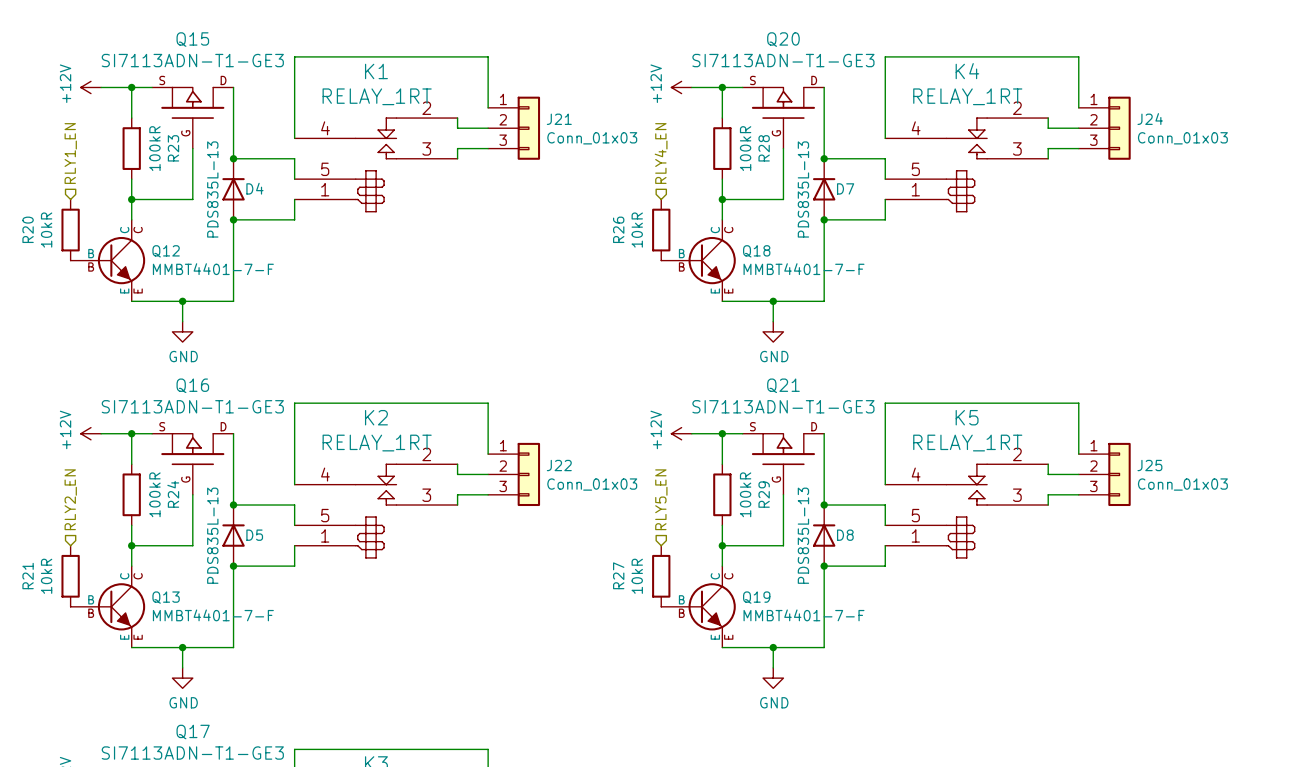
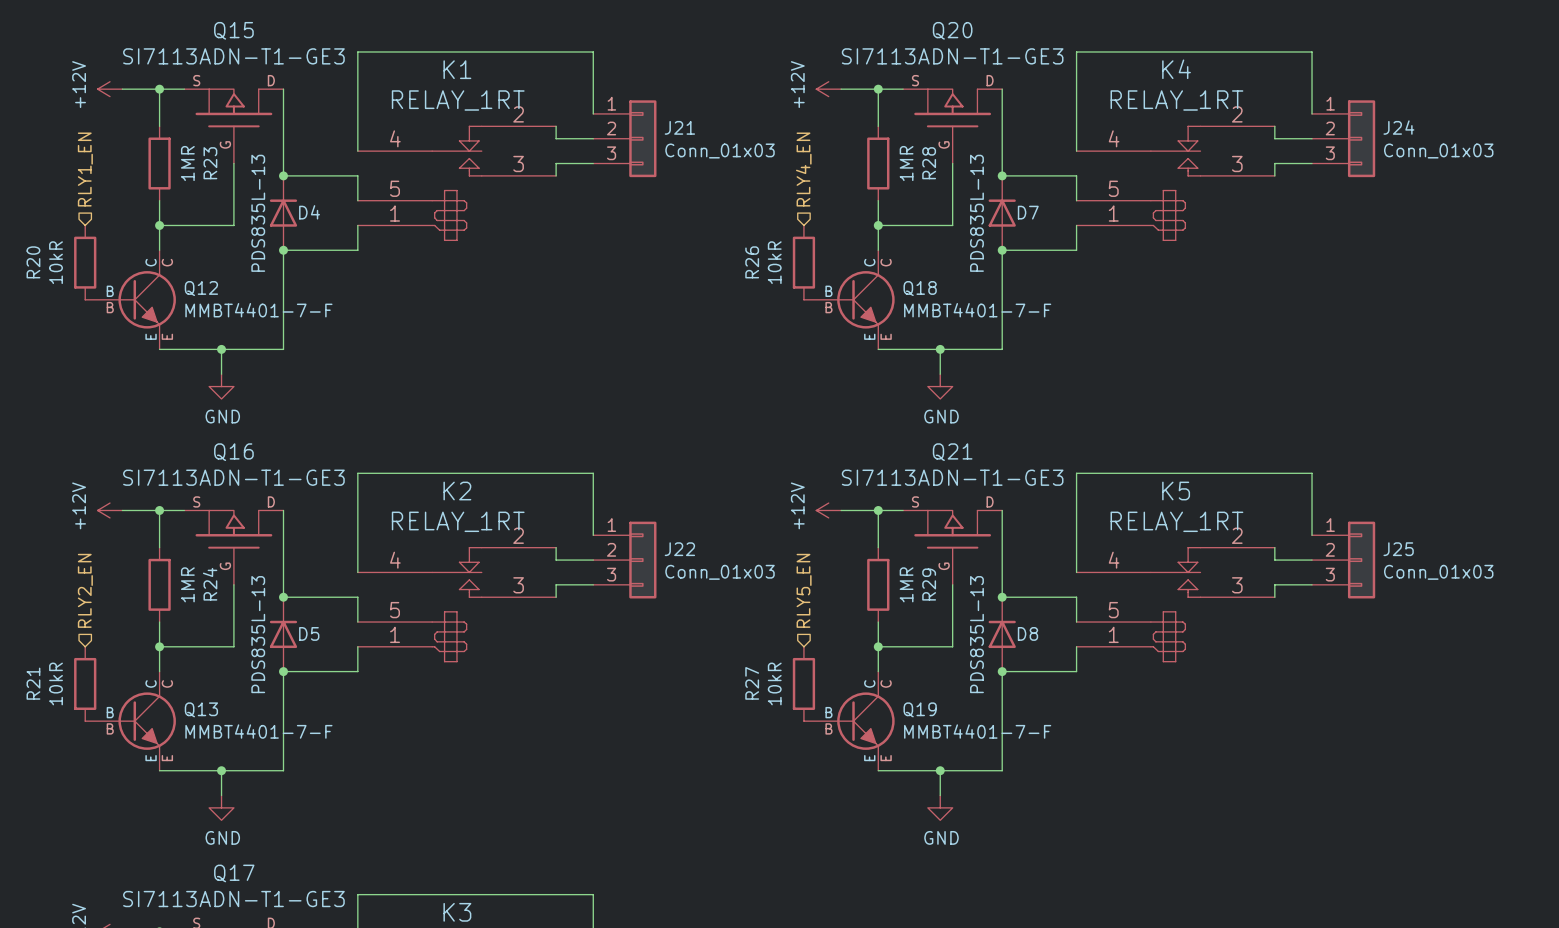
R23 value: 100kR (154, 148) -> 1MR (187, 163)
R28 value: 100kR (745, 148) -> 1MR (906, 163)
R24 value: 100kR (154, 494) -> 1MR (187, 584)
R29 value: 100kR (745, 494) -> 1MR (906, 584)

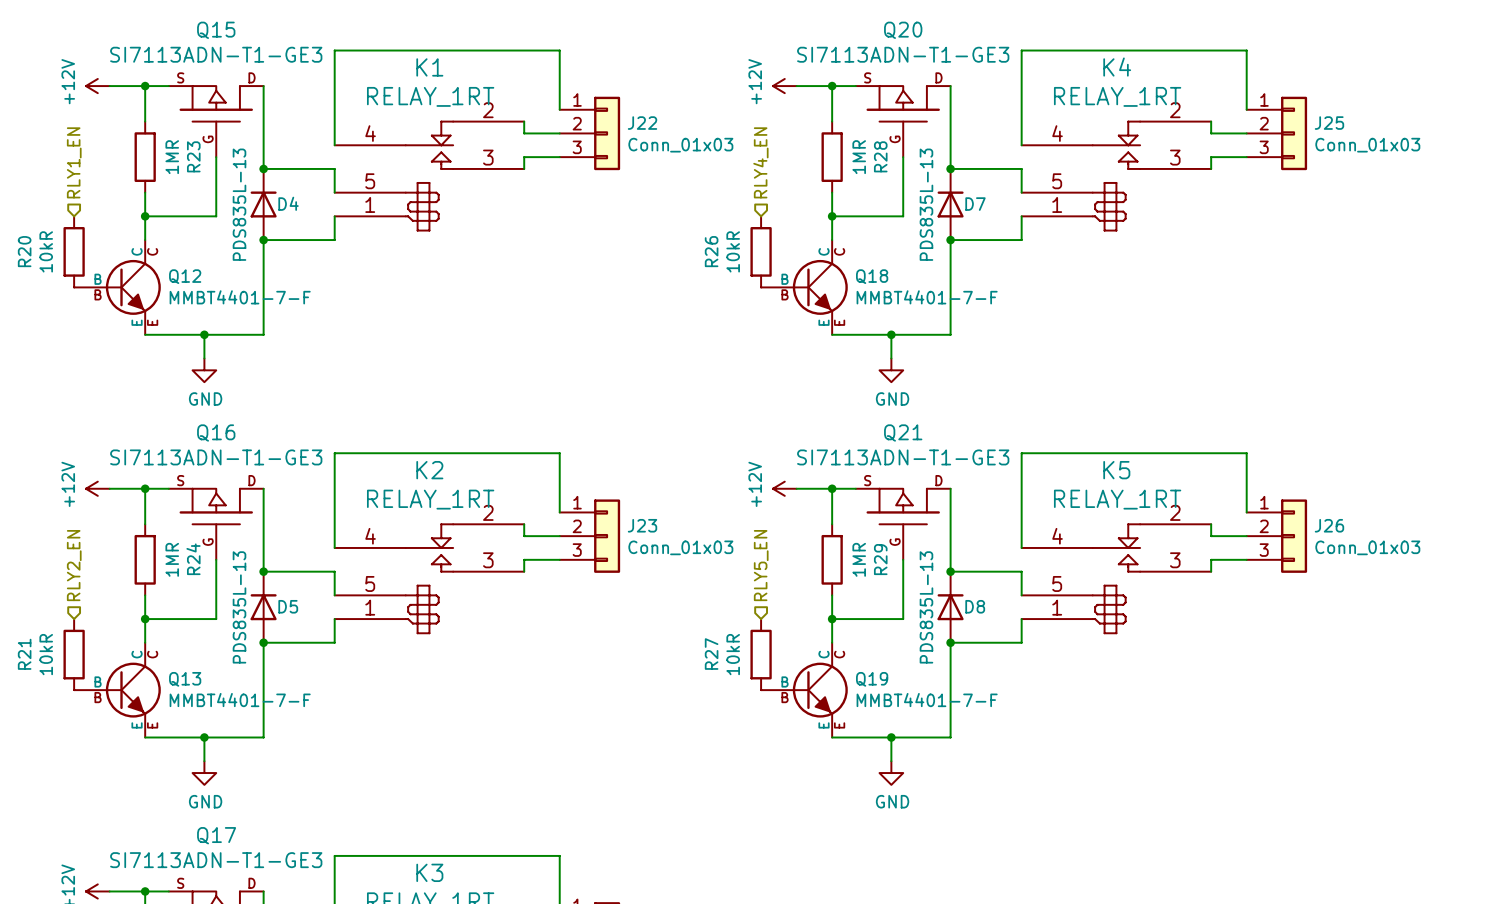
J21 name: J21 (679, 127) -> J22 (642, 123)
J24 name: J24 (1398, 127) -> J25 (1329, 123)
J22 name: J22 (679, 549) -> J23 (642, 525)
J25 name: J25 (1398, 549) -> J26 (1329, 525)

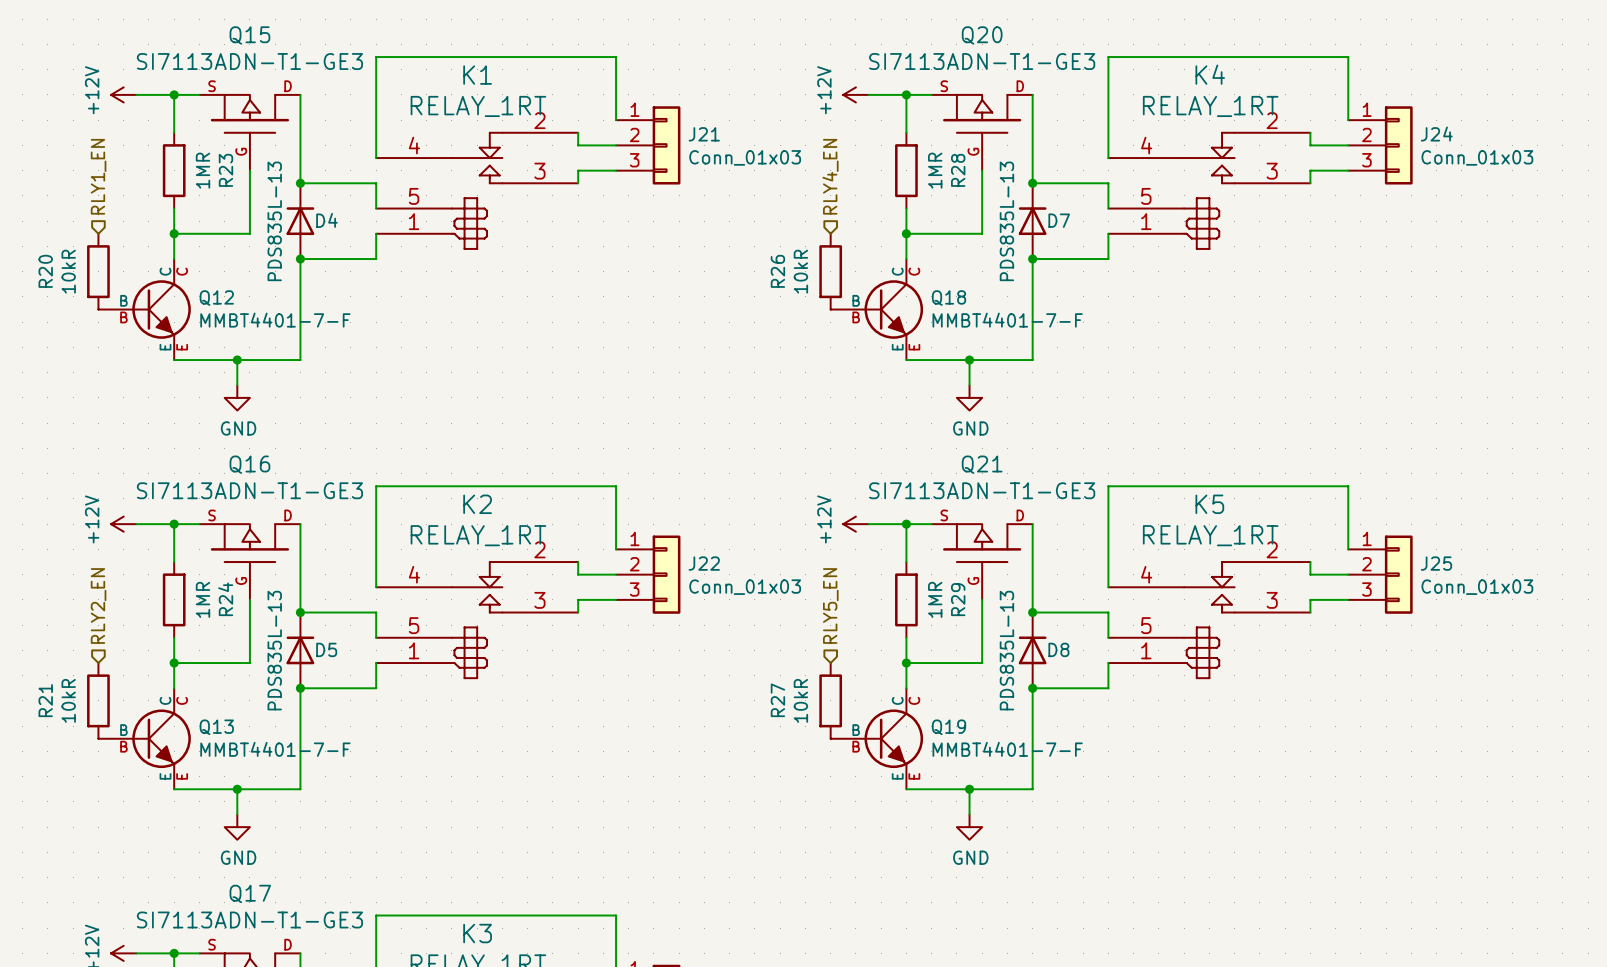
J22 name: J22 (642, 123) -> J21 (704, 134)
J25 name: J25 (1329, 123) -> J24 (1436, 134)
J23 name: J23 (642, 525) -> J22 (704, 563)
J26 name: J26 (1329, 525) -> J25 (1436, 563)

